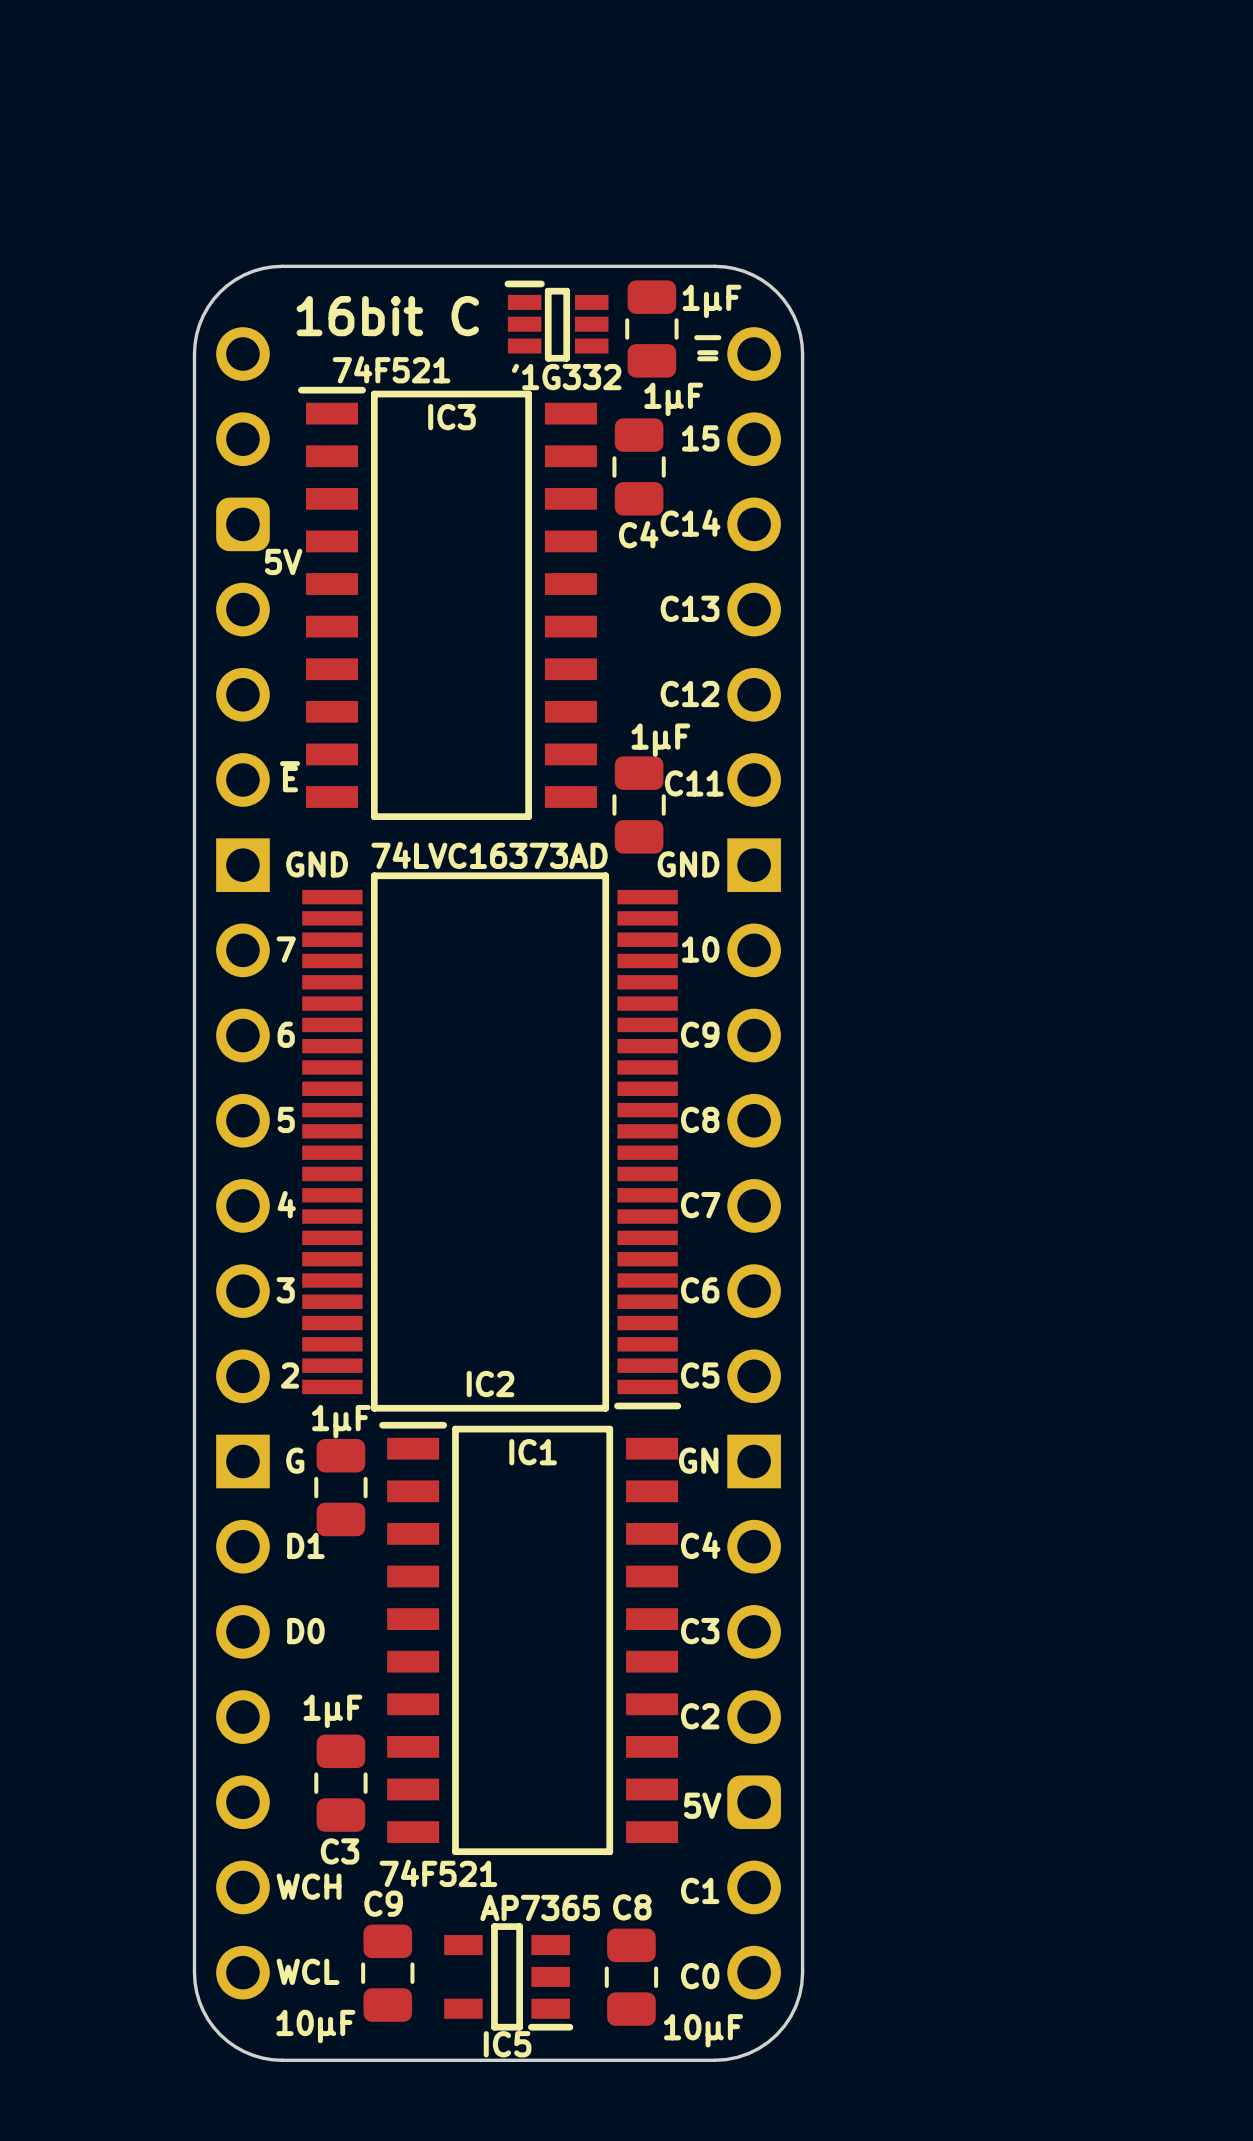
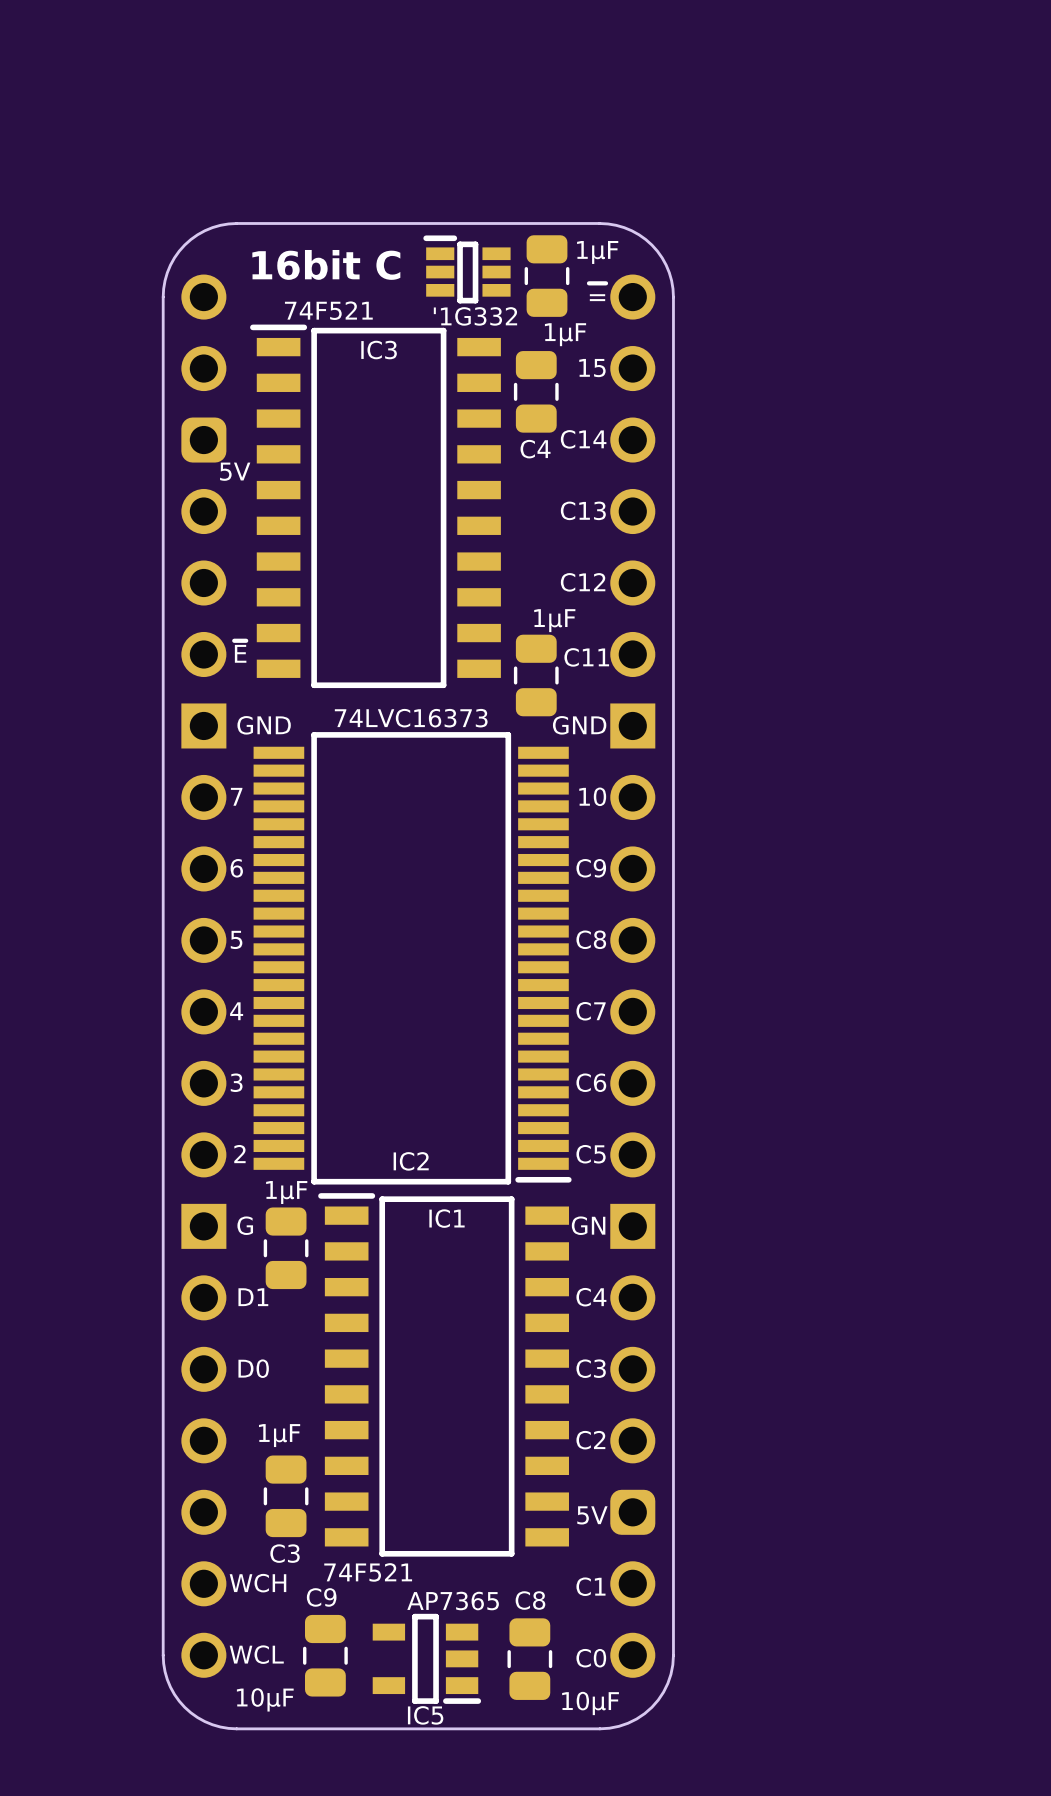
IC2 text: 74LVC16373AD (489, 855) -> 74LVC16373 (411, 718)

